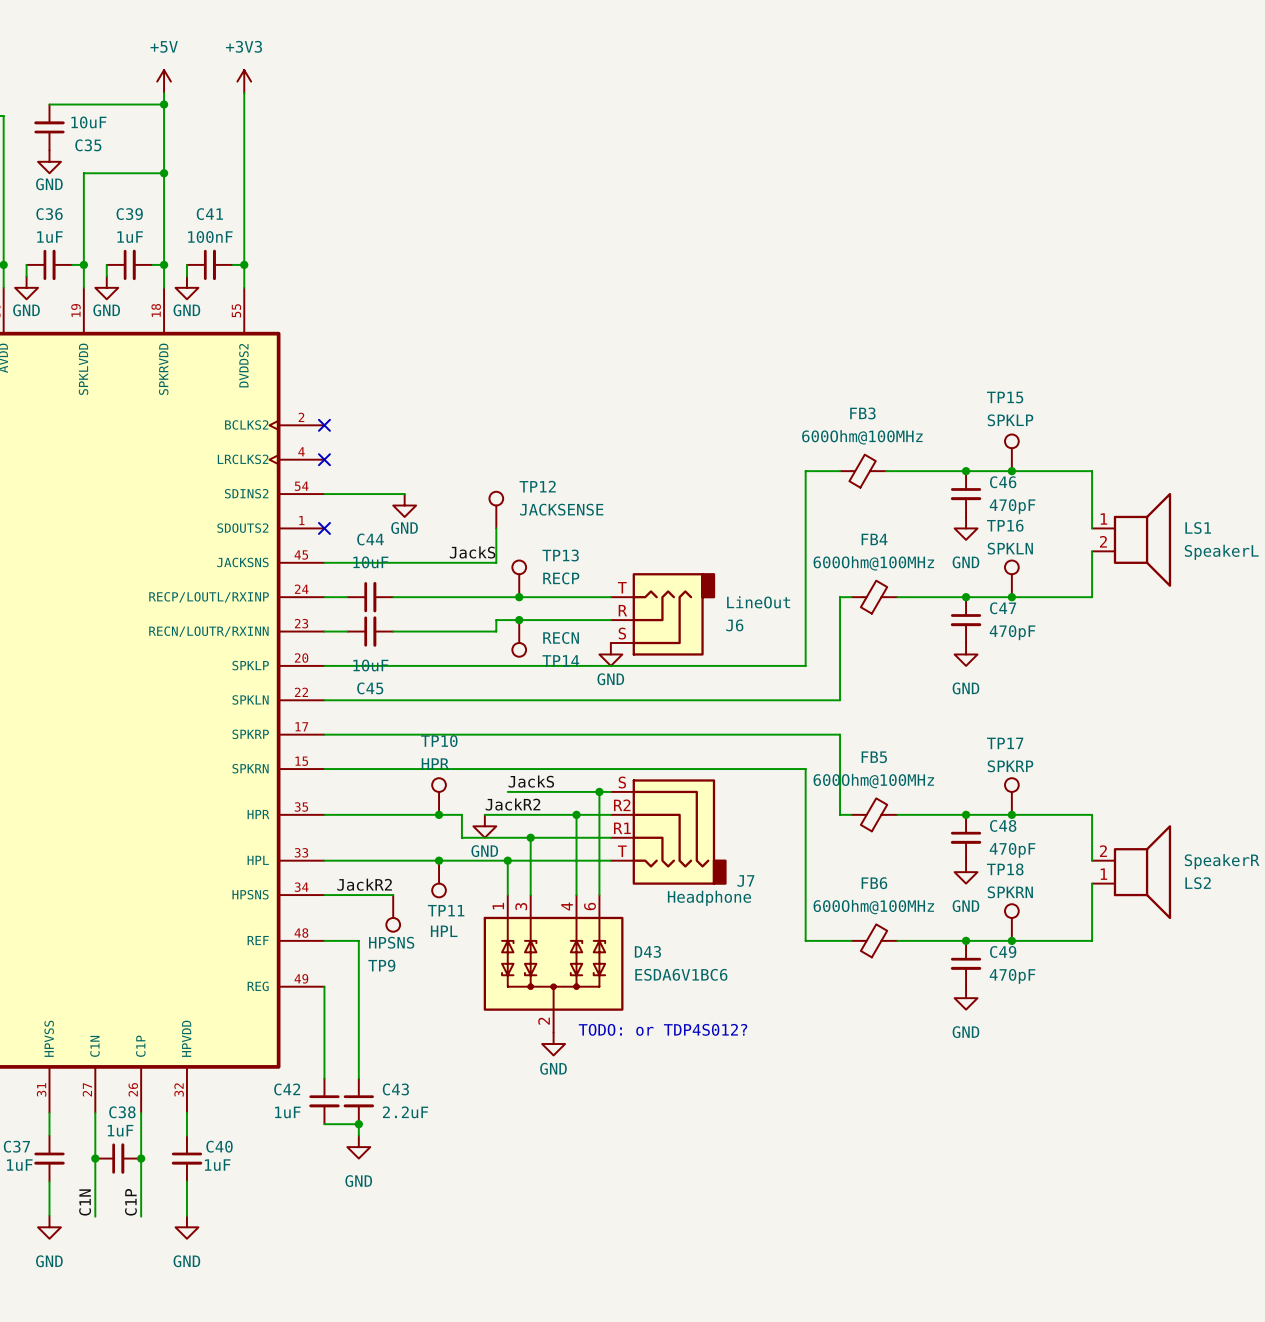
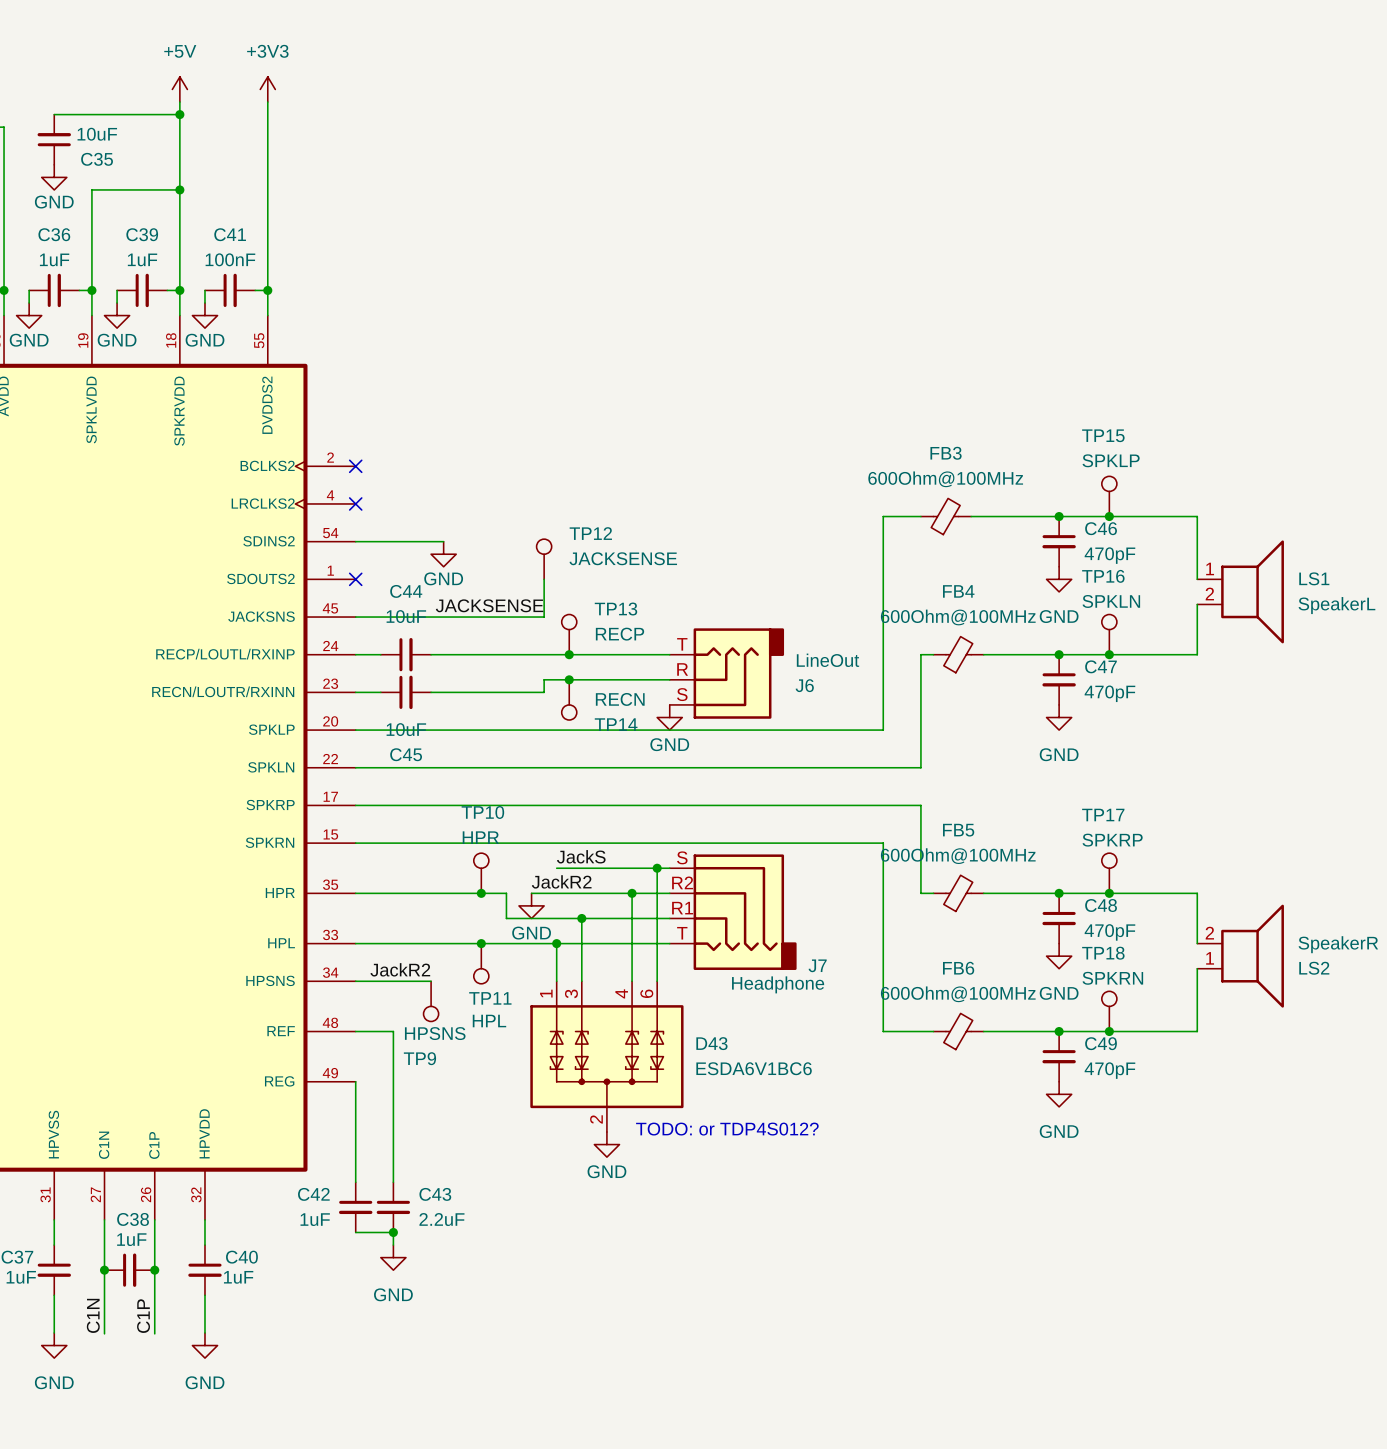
label: JackS (472, 552) -> JACKSENSE (489, 605)

